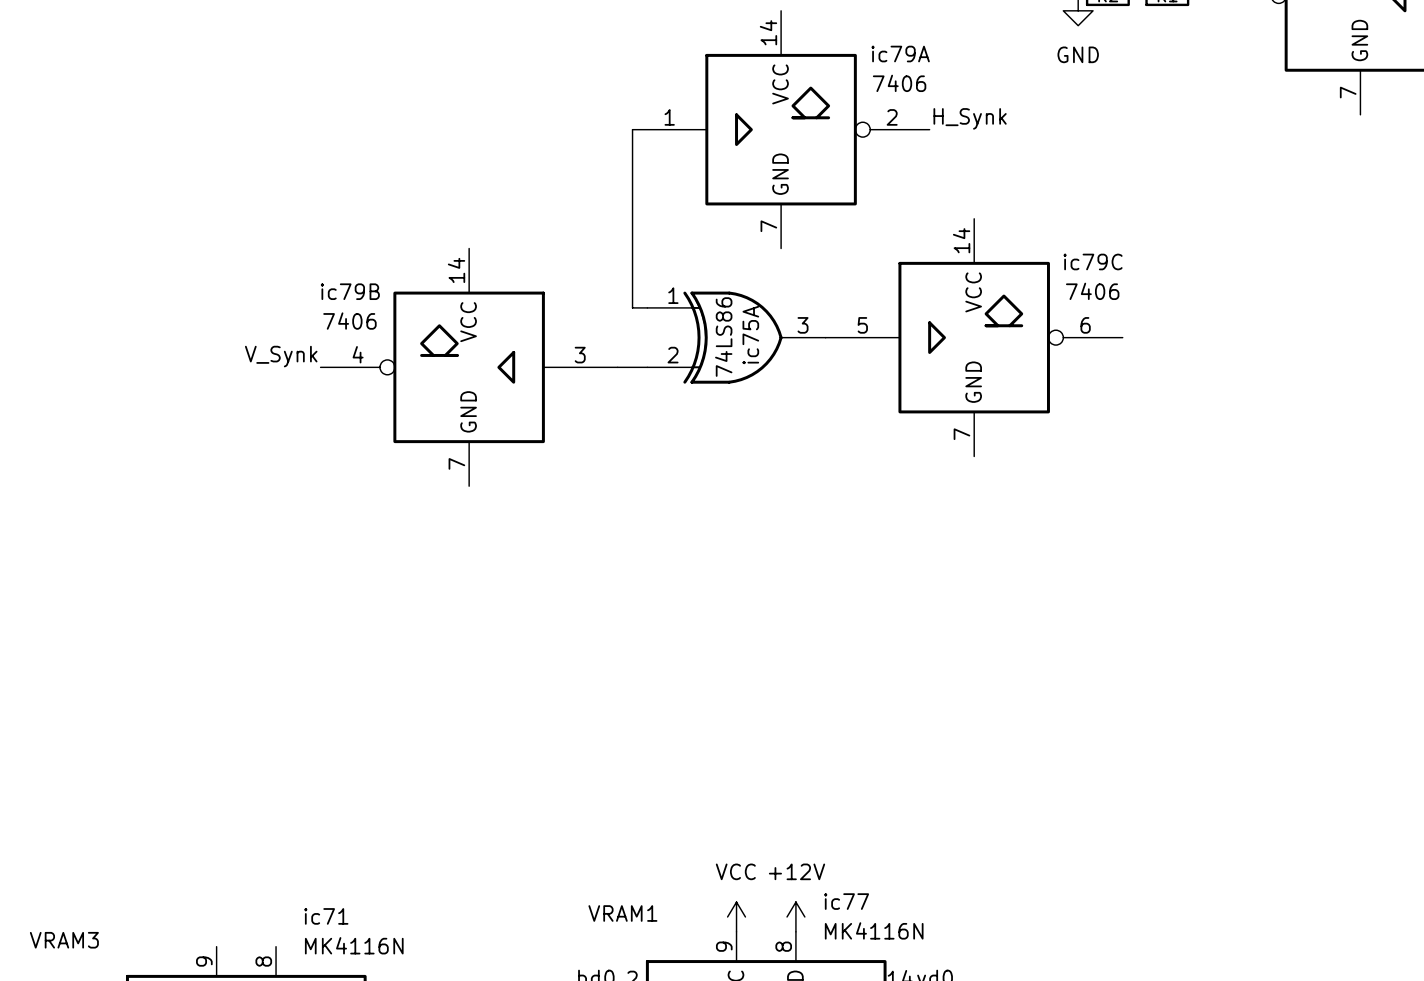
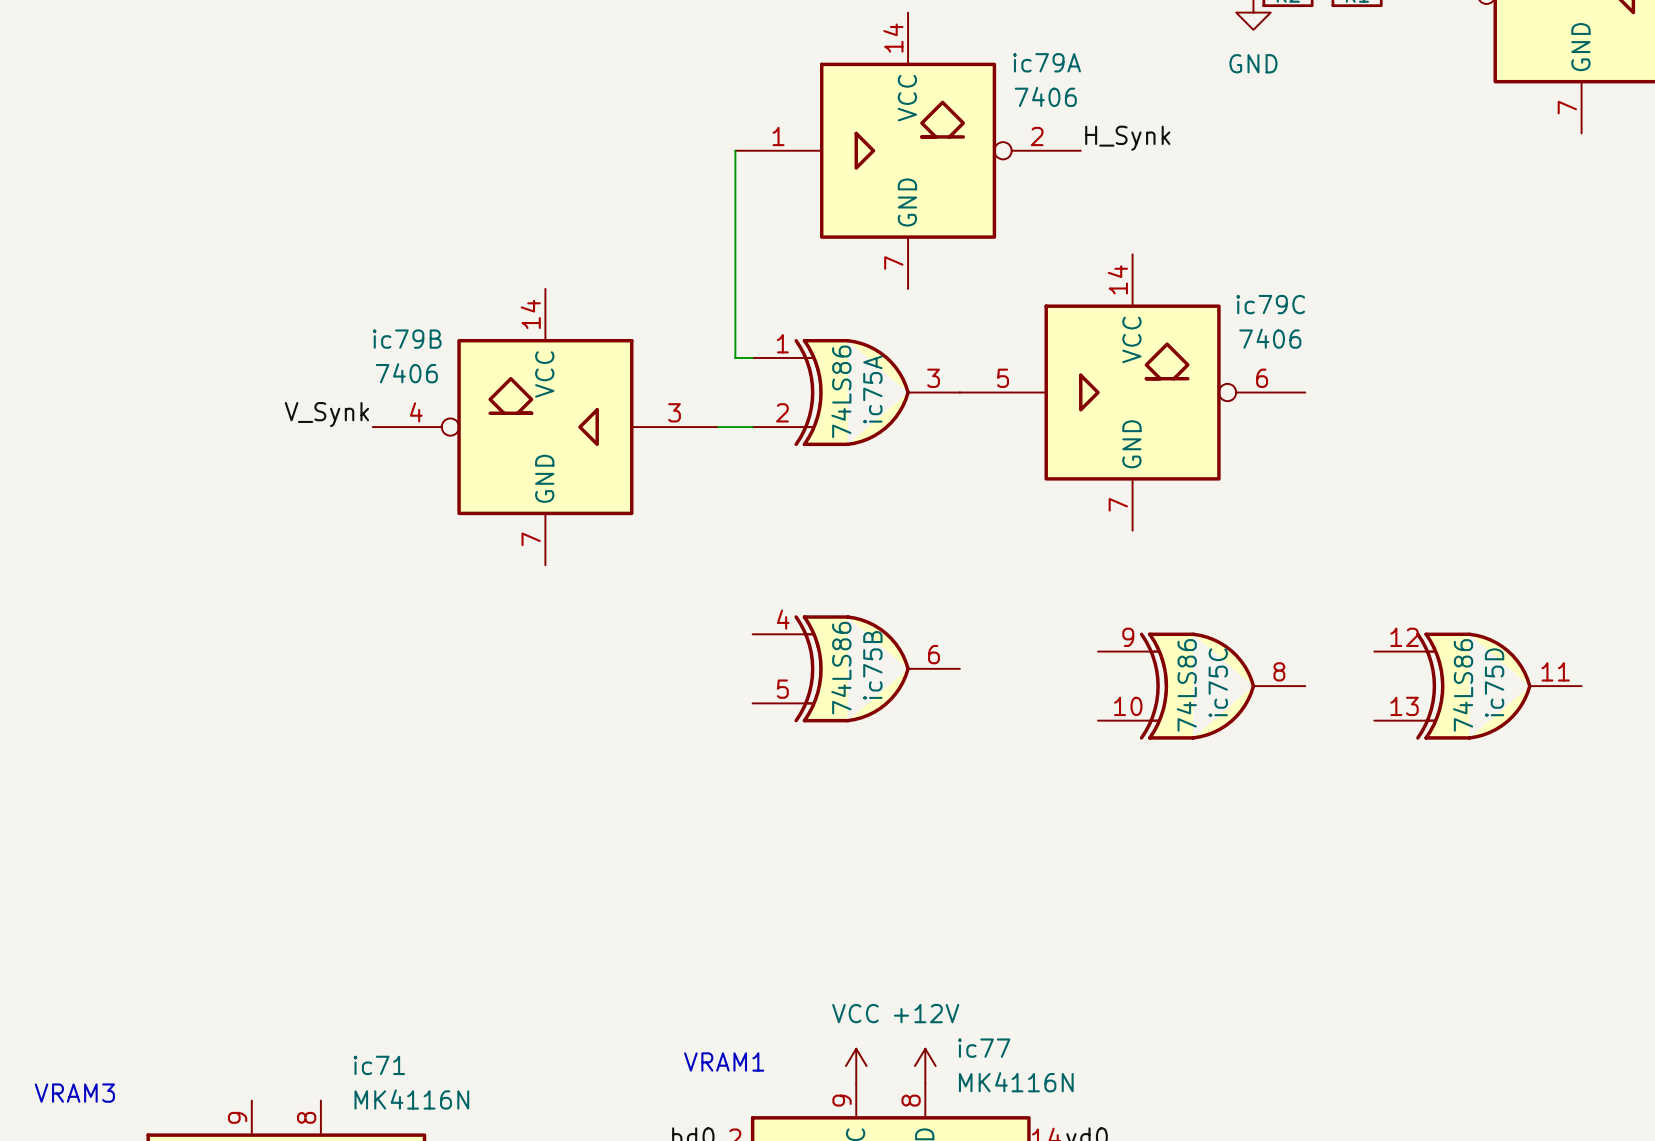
ic75B: none -> 74LS86 (856, 668)
ic75C: none -> 74LS86 (1201, 686)
ic75D: none -> 74LS86 (1477, 686)

